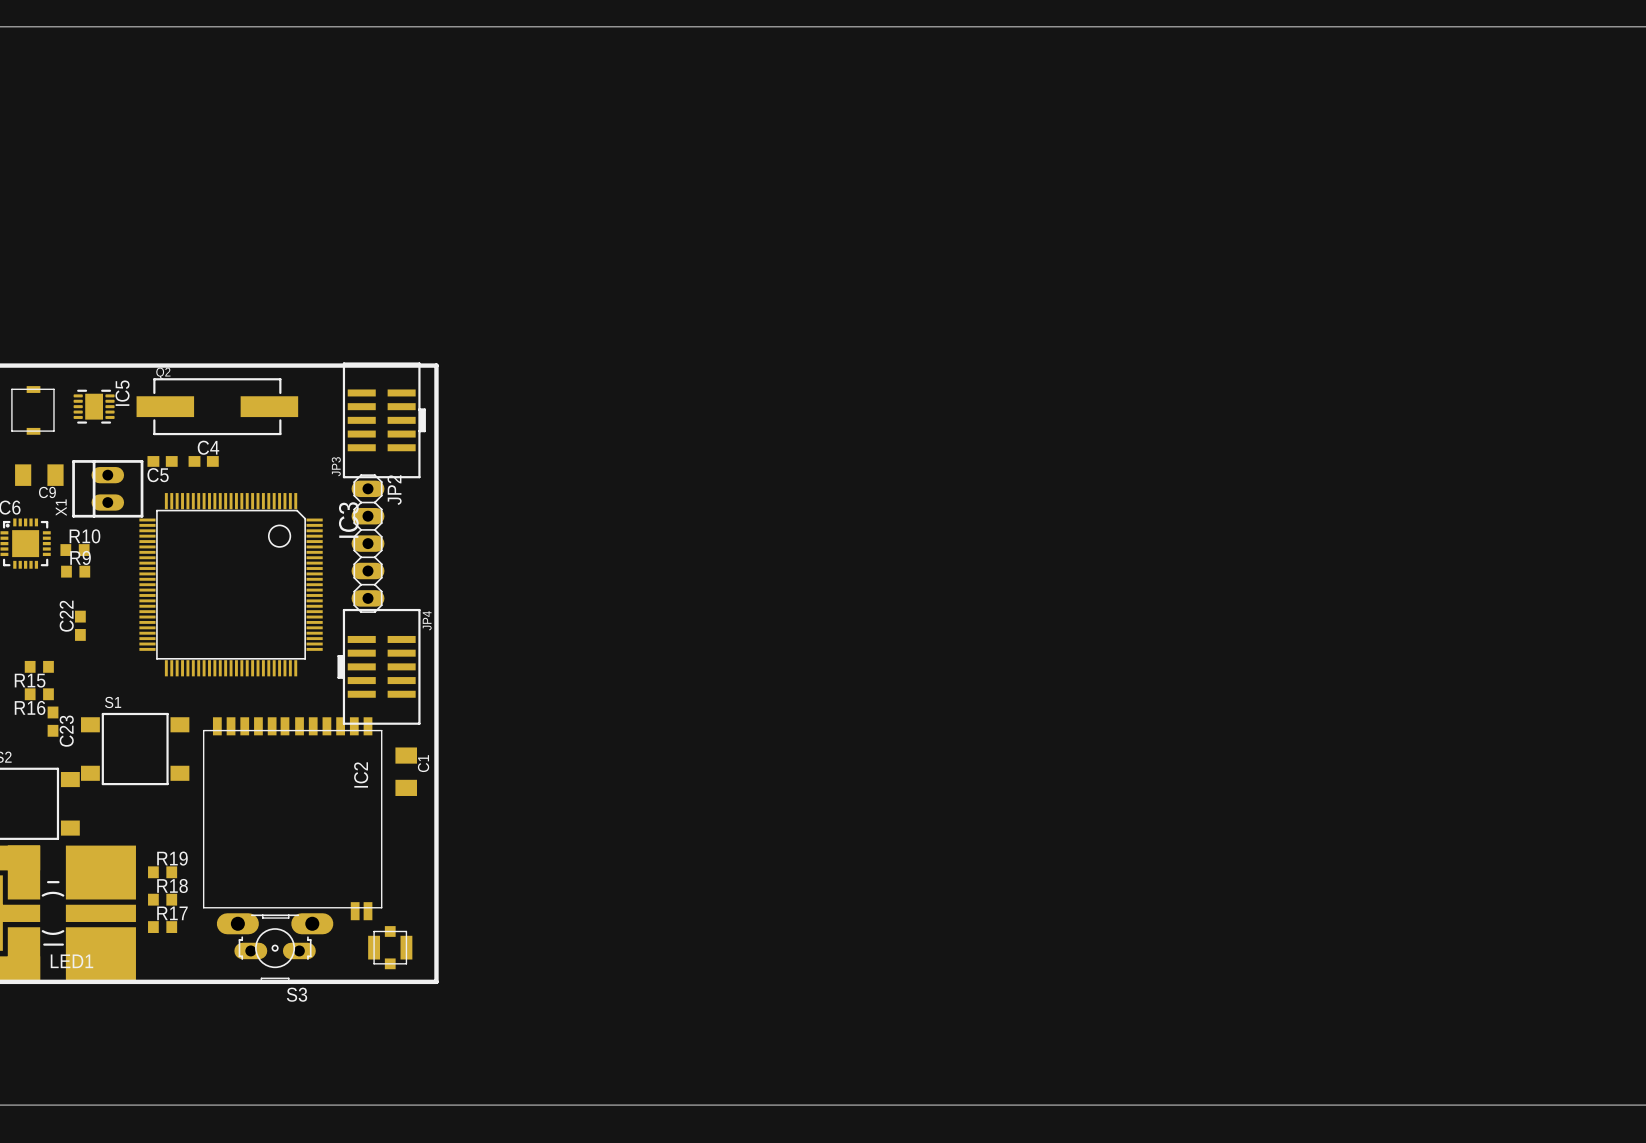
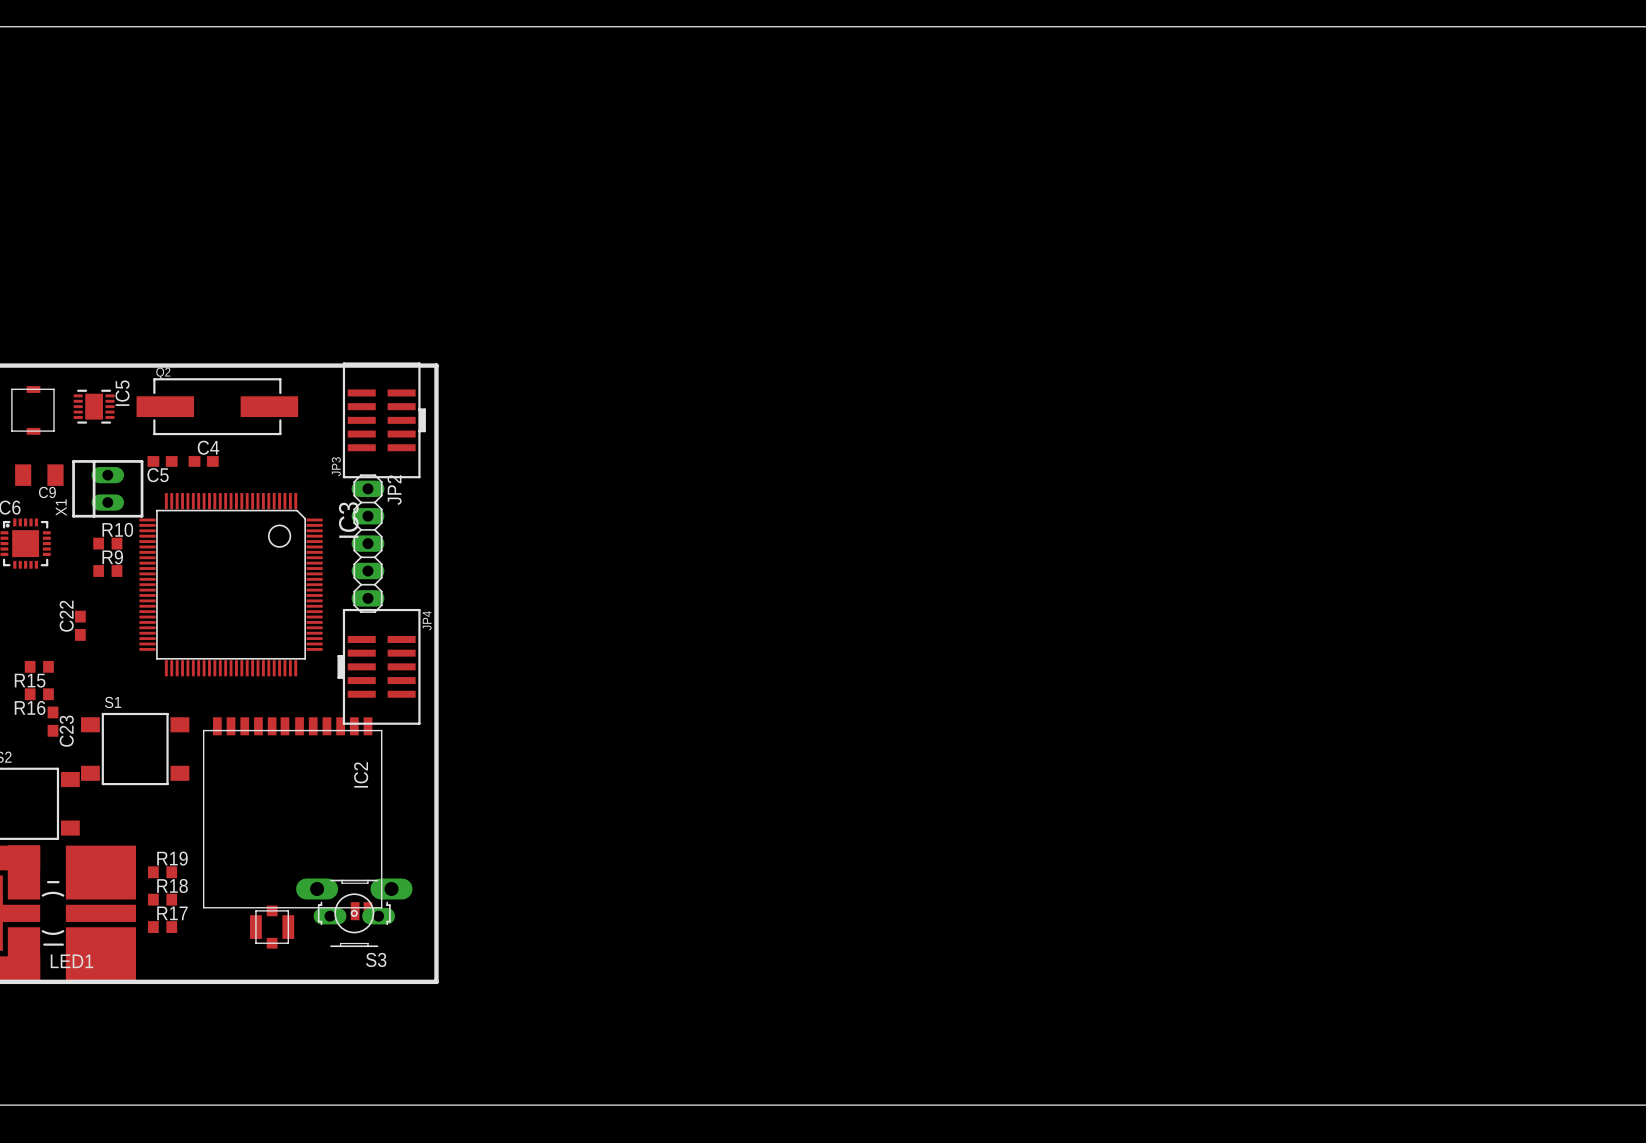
R10 position: (75, 550) -> (107, 543)
R9 position: (75, 571) -> (107, 571)
C1: (406, 771) -> none
S3 position: (275, 947) -> (354, 912)
part position: (390, 947) -> (272, 927)

